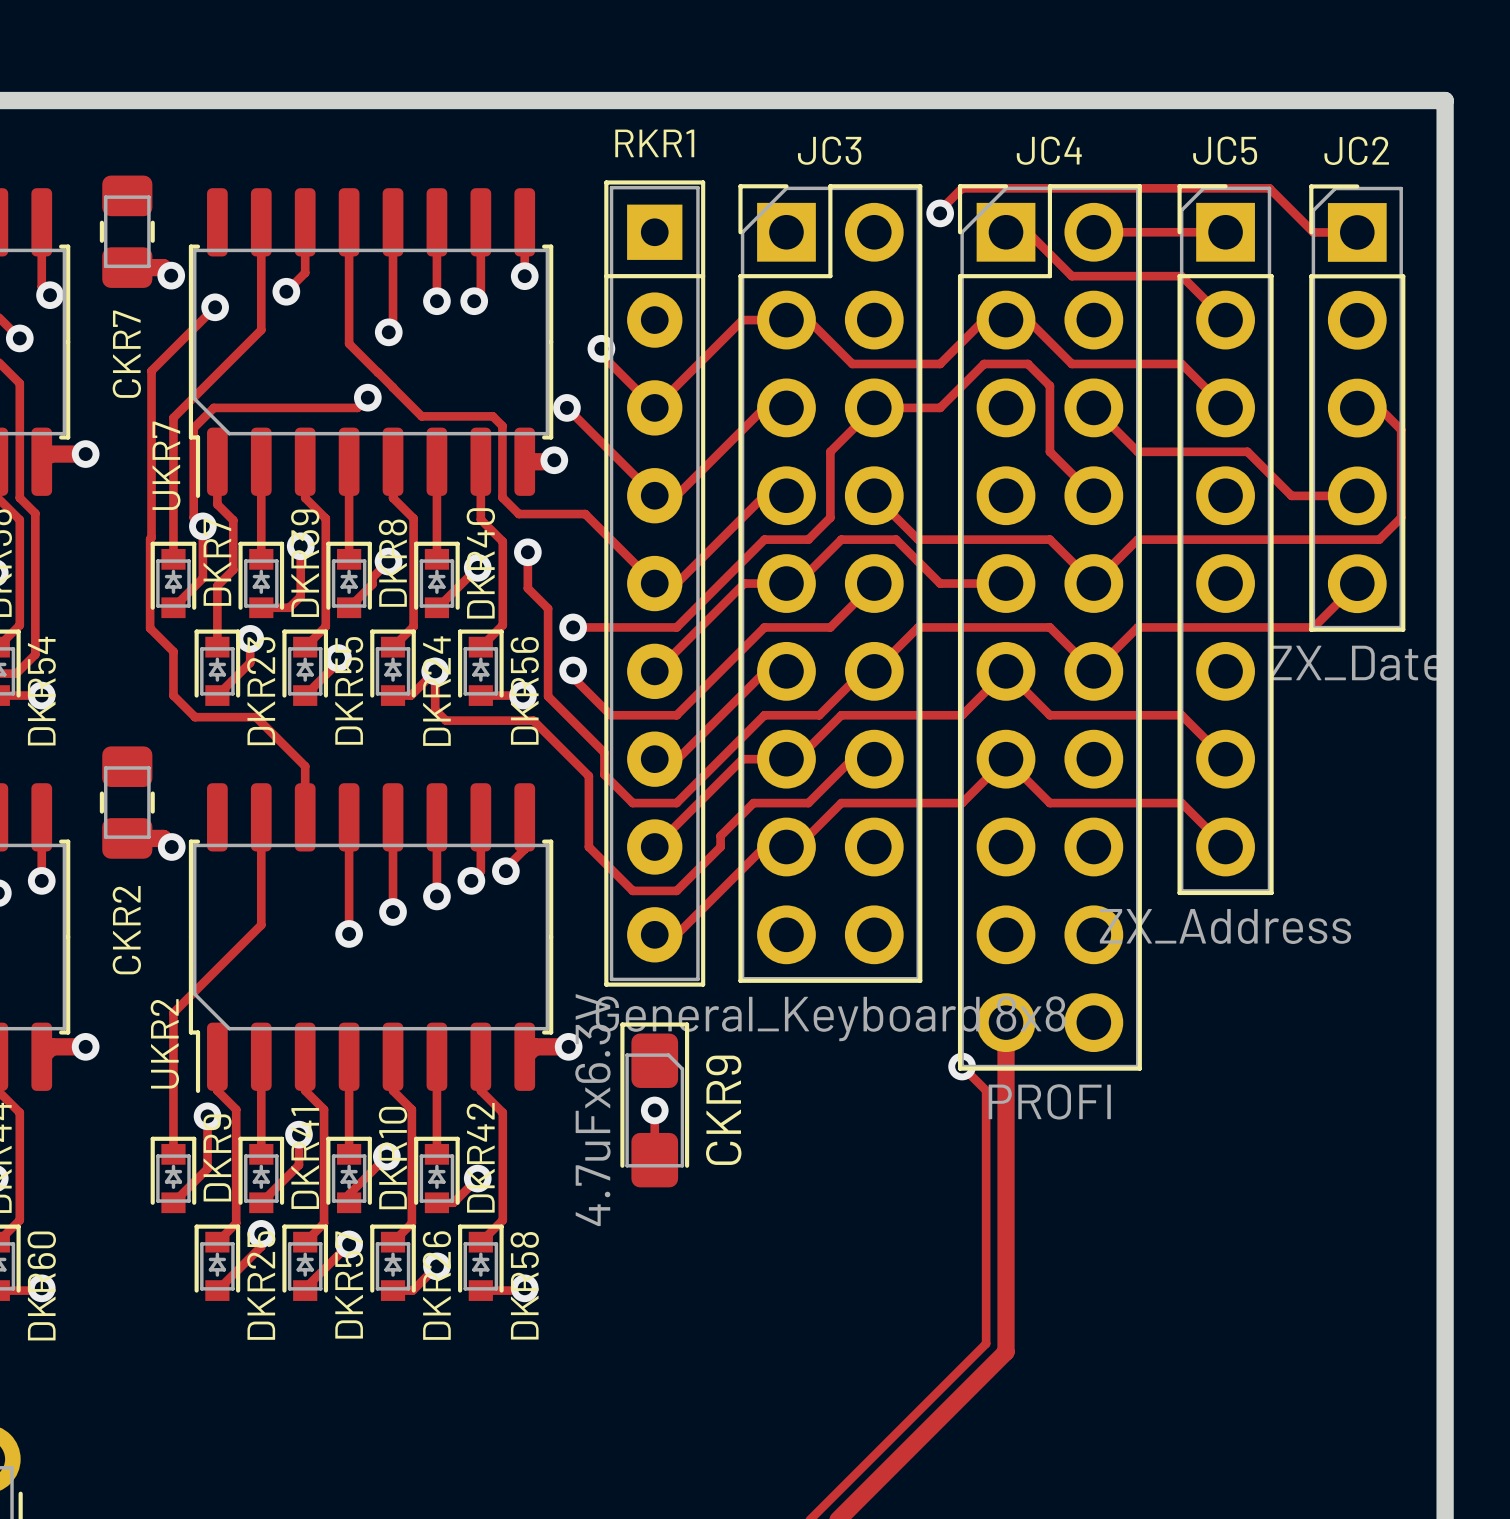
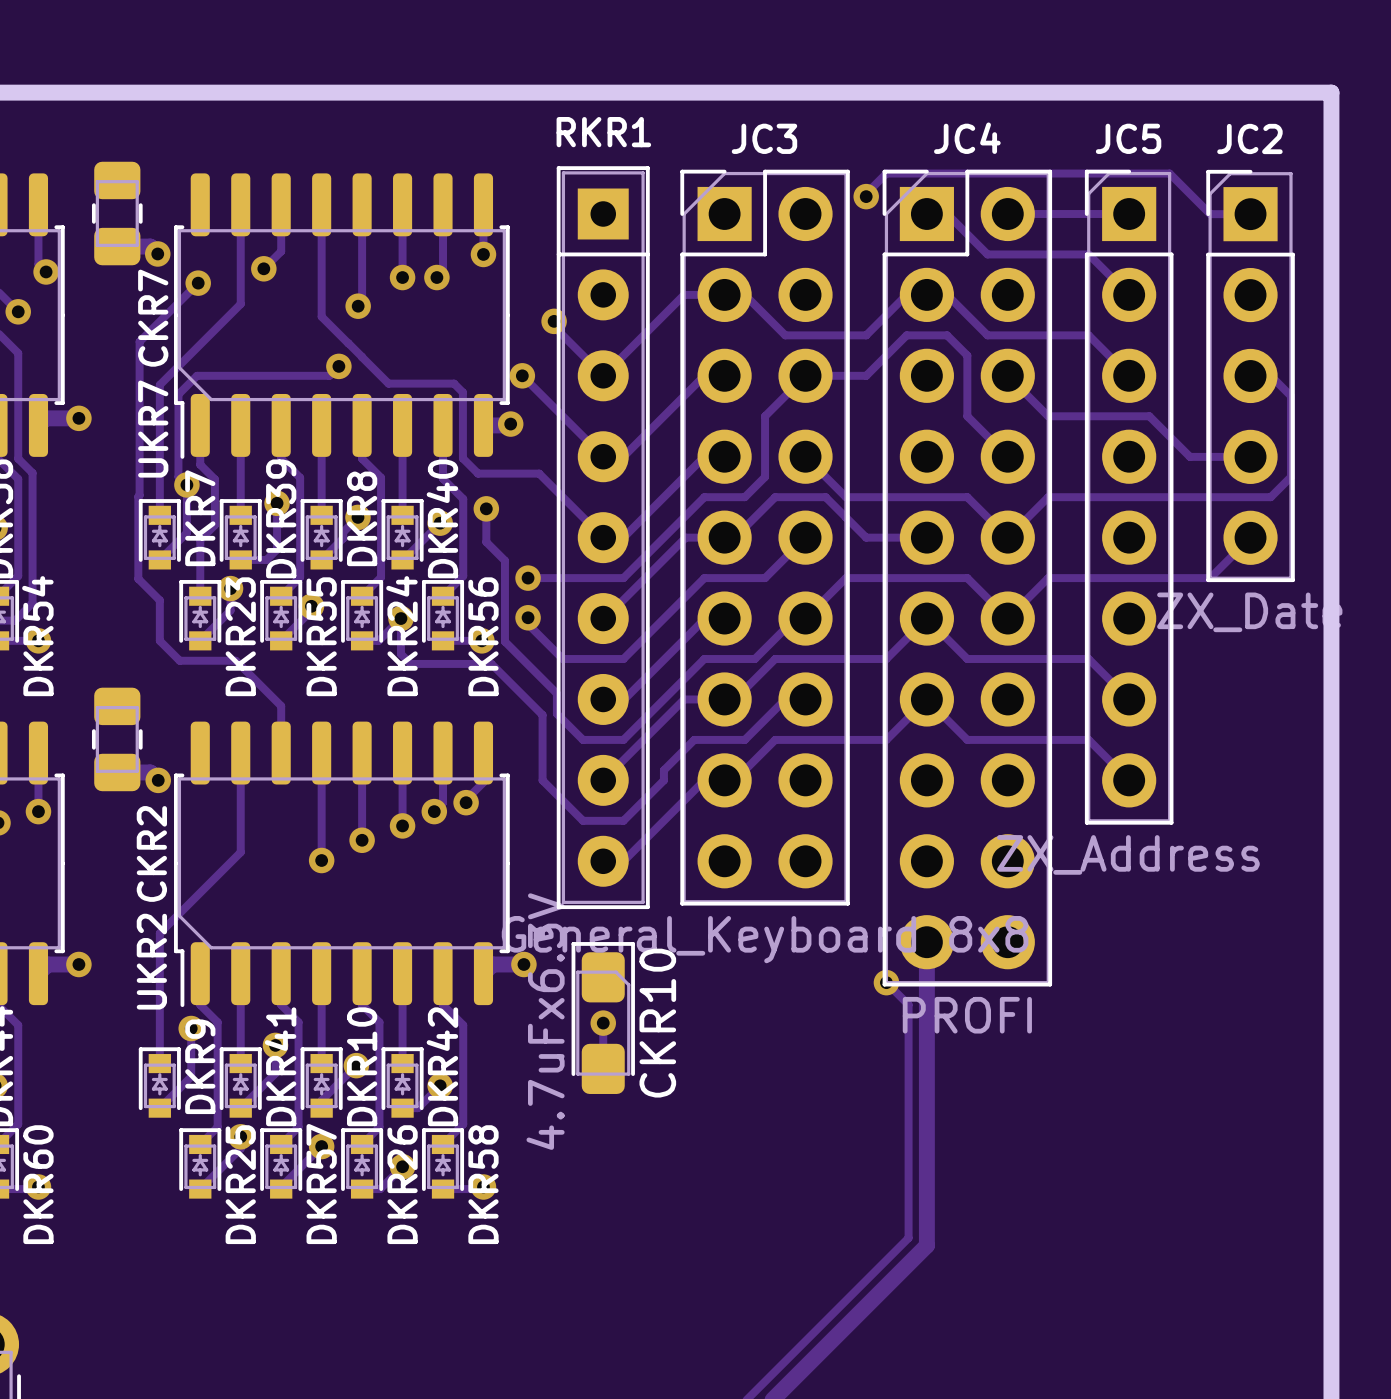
CKR7 name position: CKR7 (126, 354) -> CKR7 (153, 318)
CKR2 name position: CKR2 (126, 930) -> CKR2 (151, 853)
CKR9 name: CKR9 (723, 1110) -> CKR10 (657, 1023)

